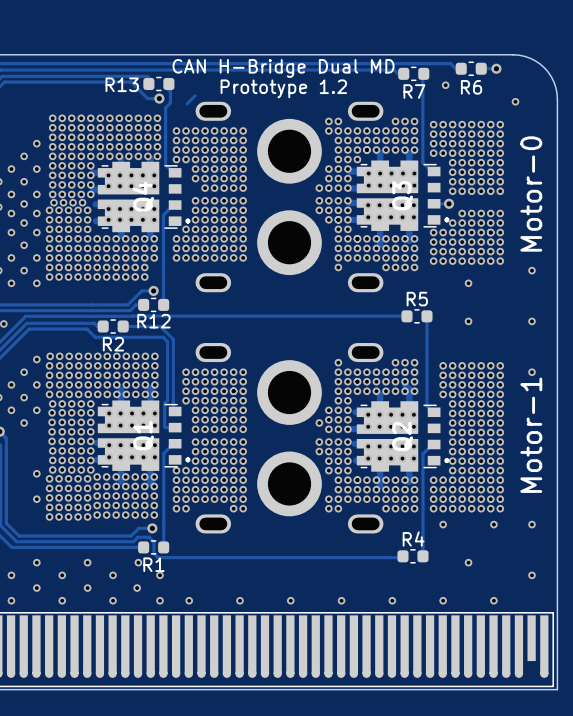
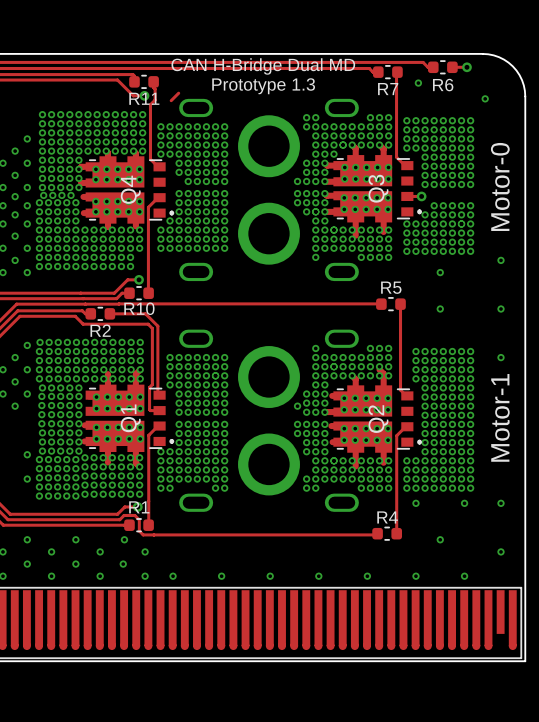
R13 name: R13 (122, 84) -> R11 (144, 98)
text: Prototype 1.2 (283, 88) -> Prototype 1.3 (263, 86)
R12 name: R12 (153, 321) -> R10 (139, 308)
R1 name position: R1 (153, 564) -> R1 (139, 507)

